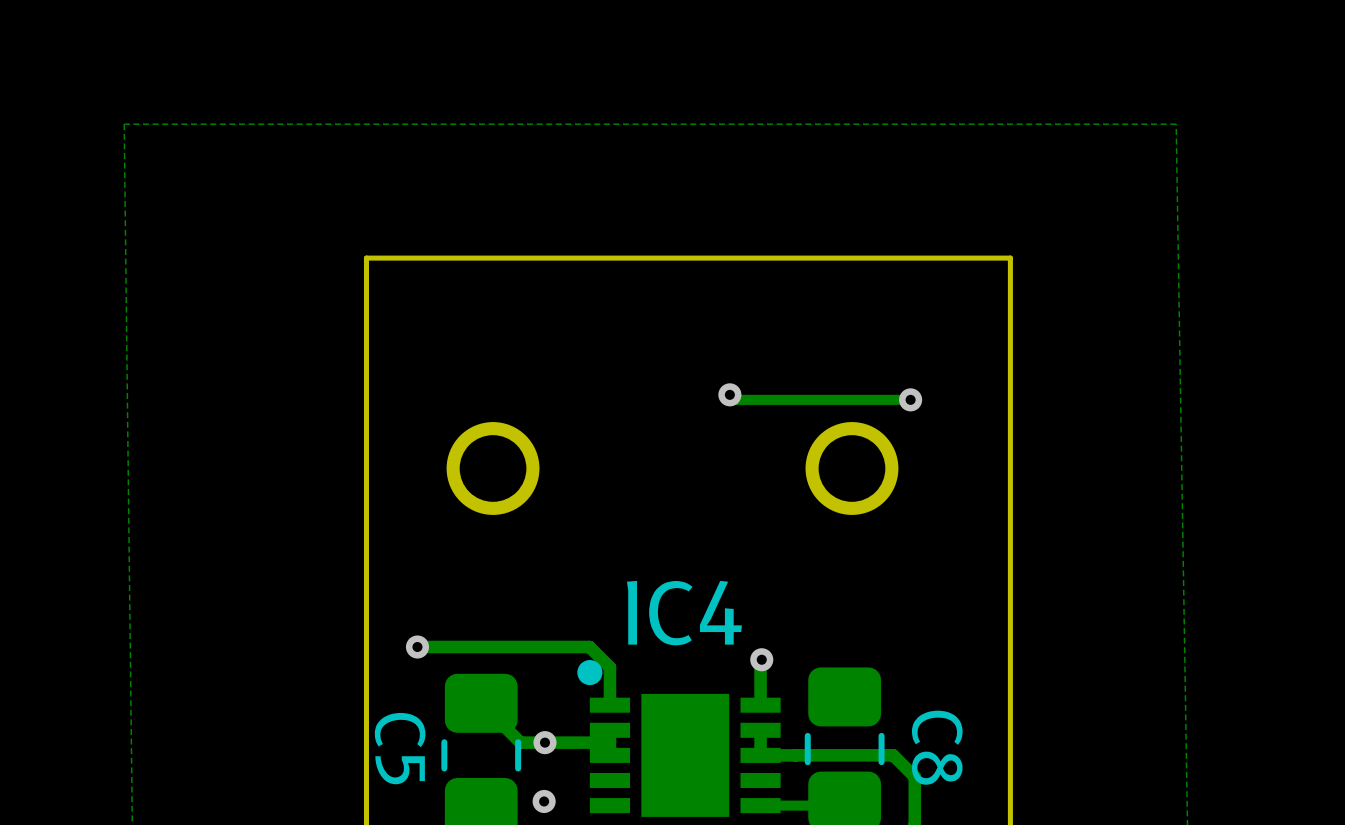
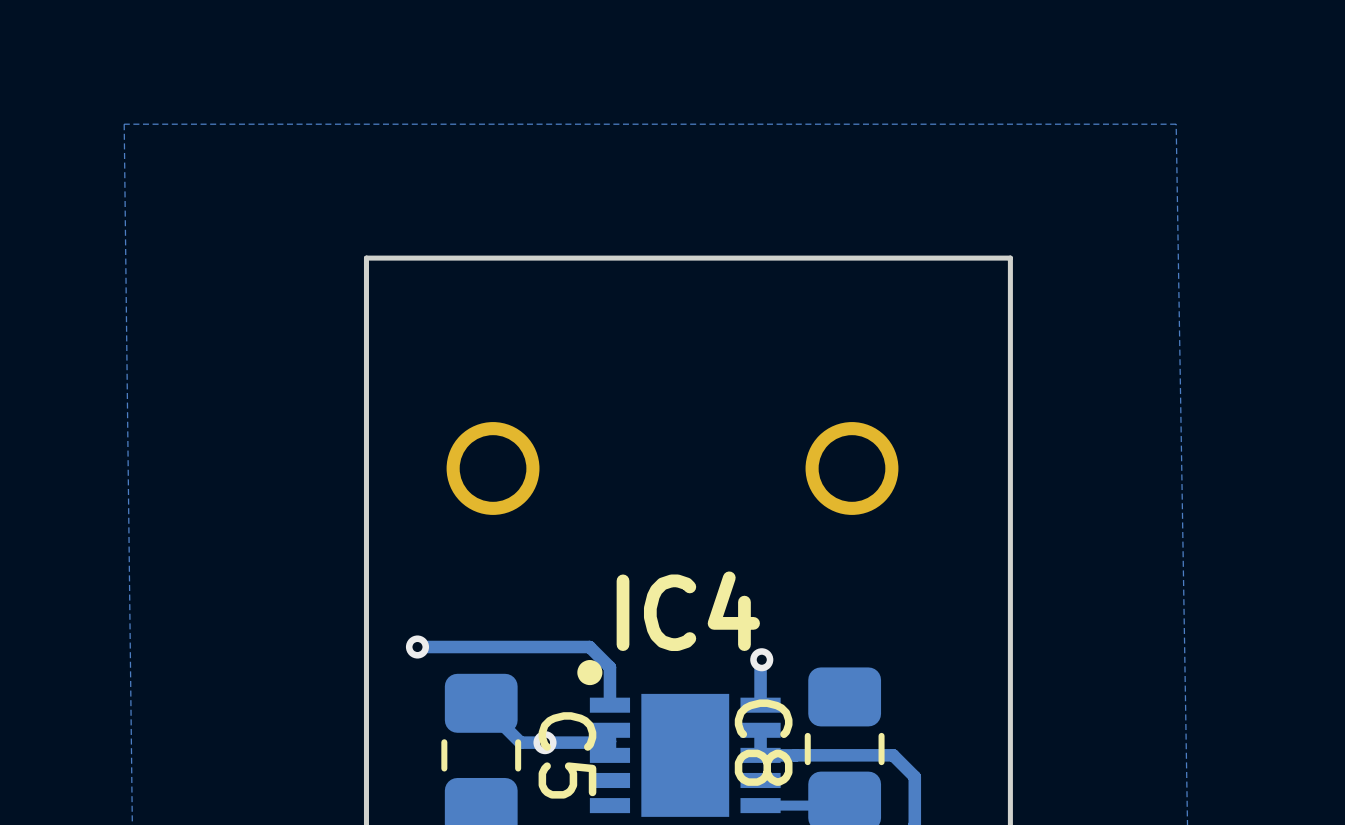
track: (729, 394) (734, 399) (910, 399) -> none
via: (729, 394) -> none
via: (910, 399) -> none
C8 name position: C8 (937, 747) -> C8 (763, 742)
C5 name position: C5 (400, 748) -> C5 (567, 755)
via: (544, 801) -> none

